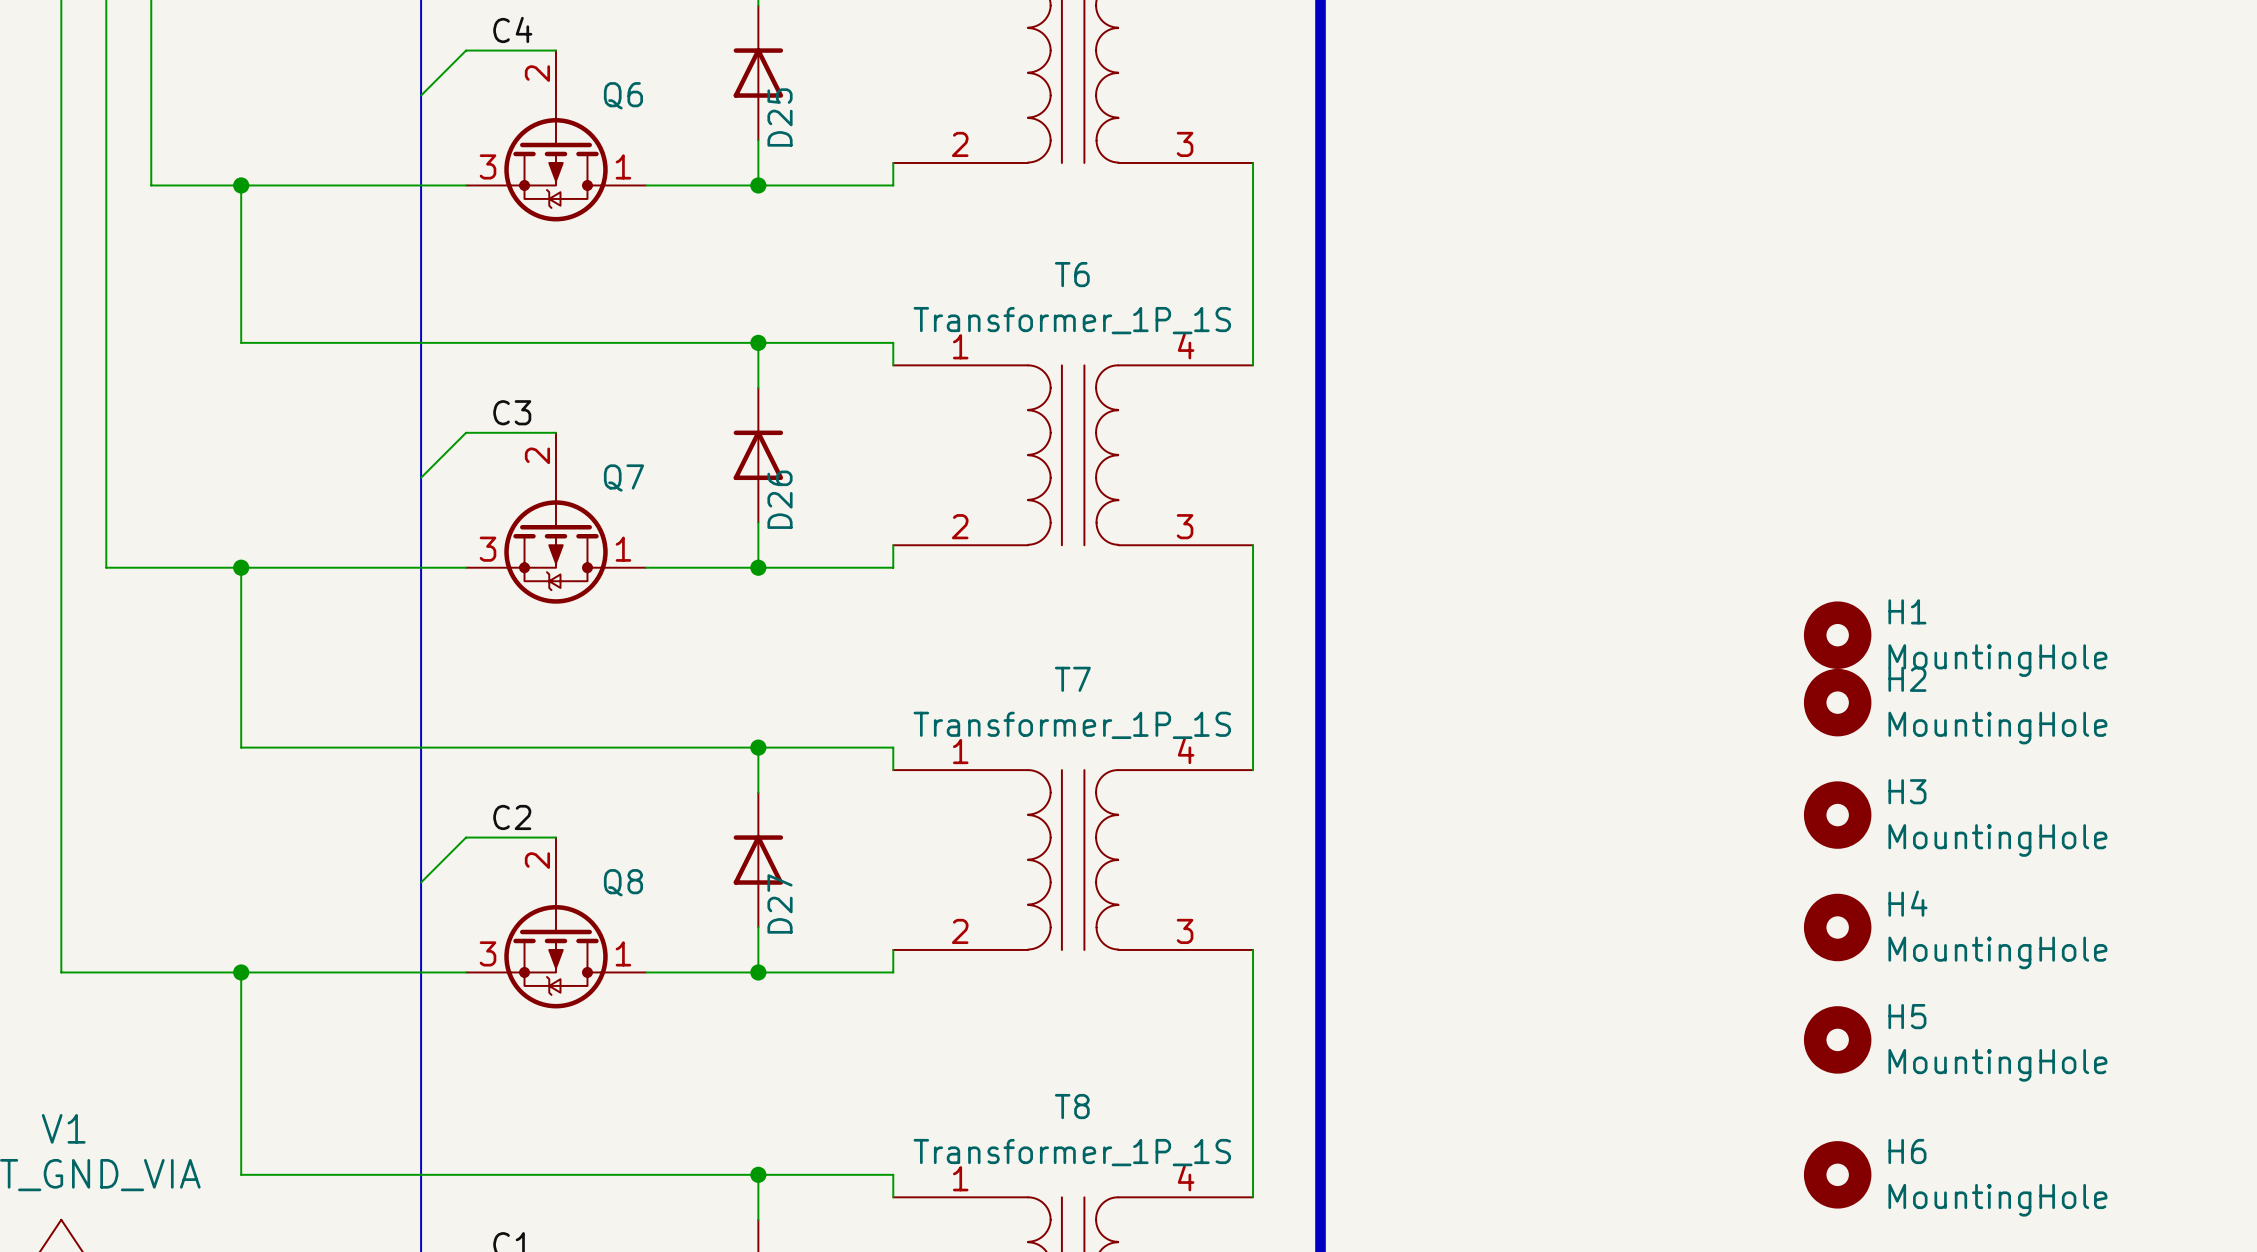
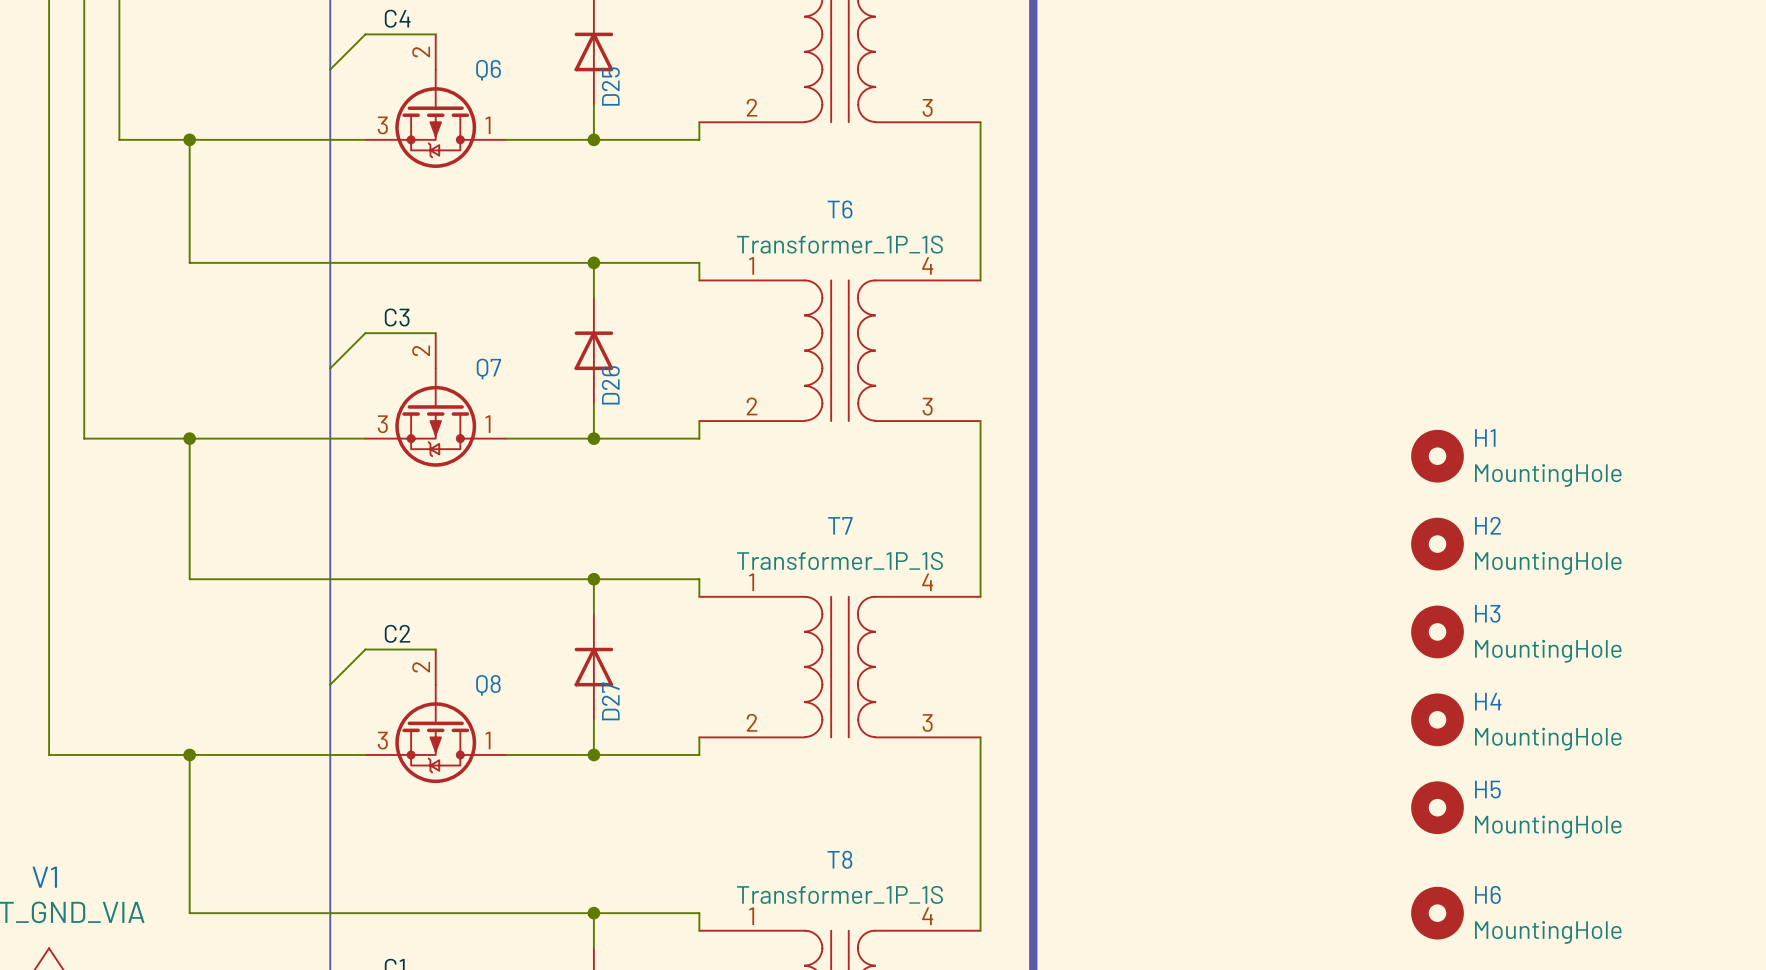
H1 position: (1837, 635) -> (1437, 456)

